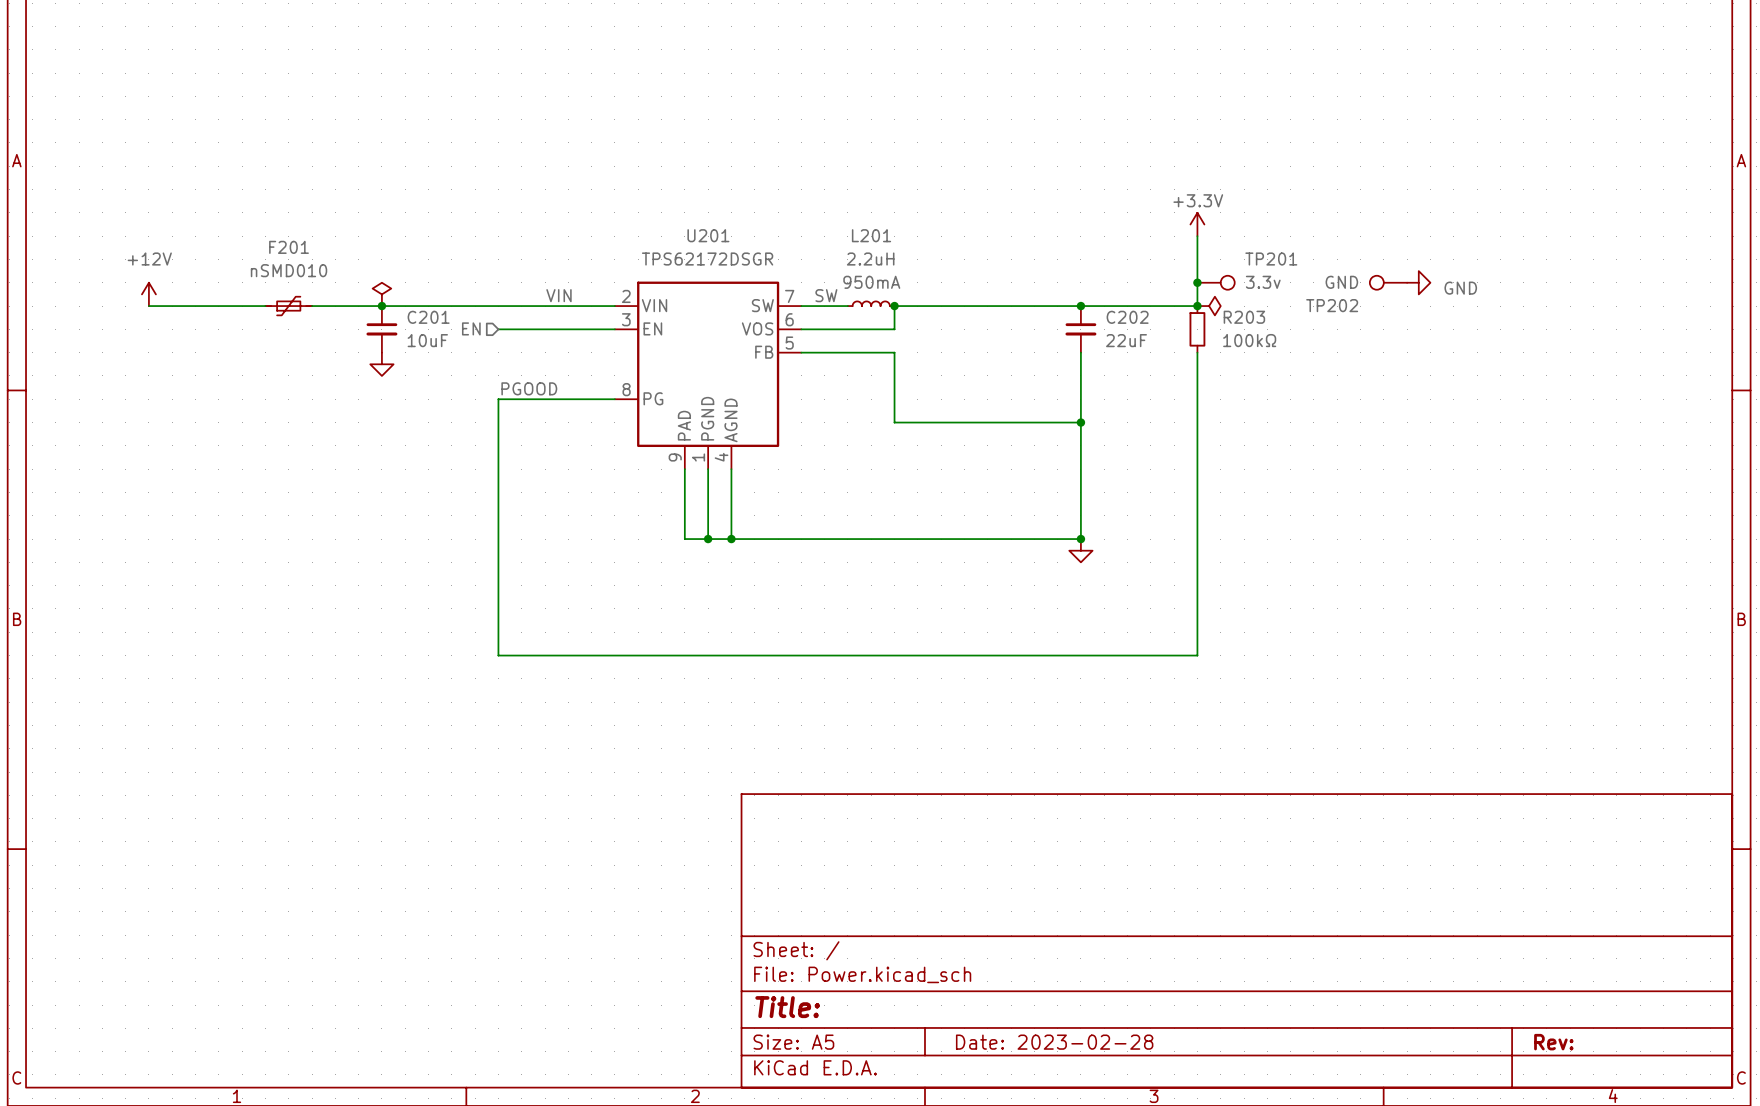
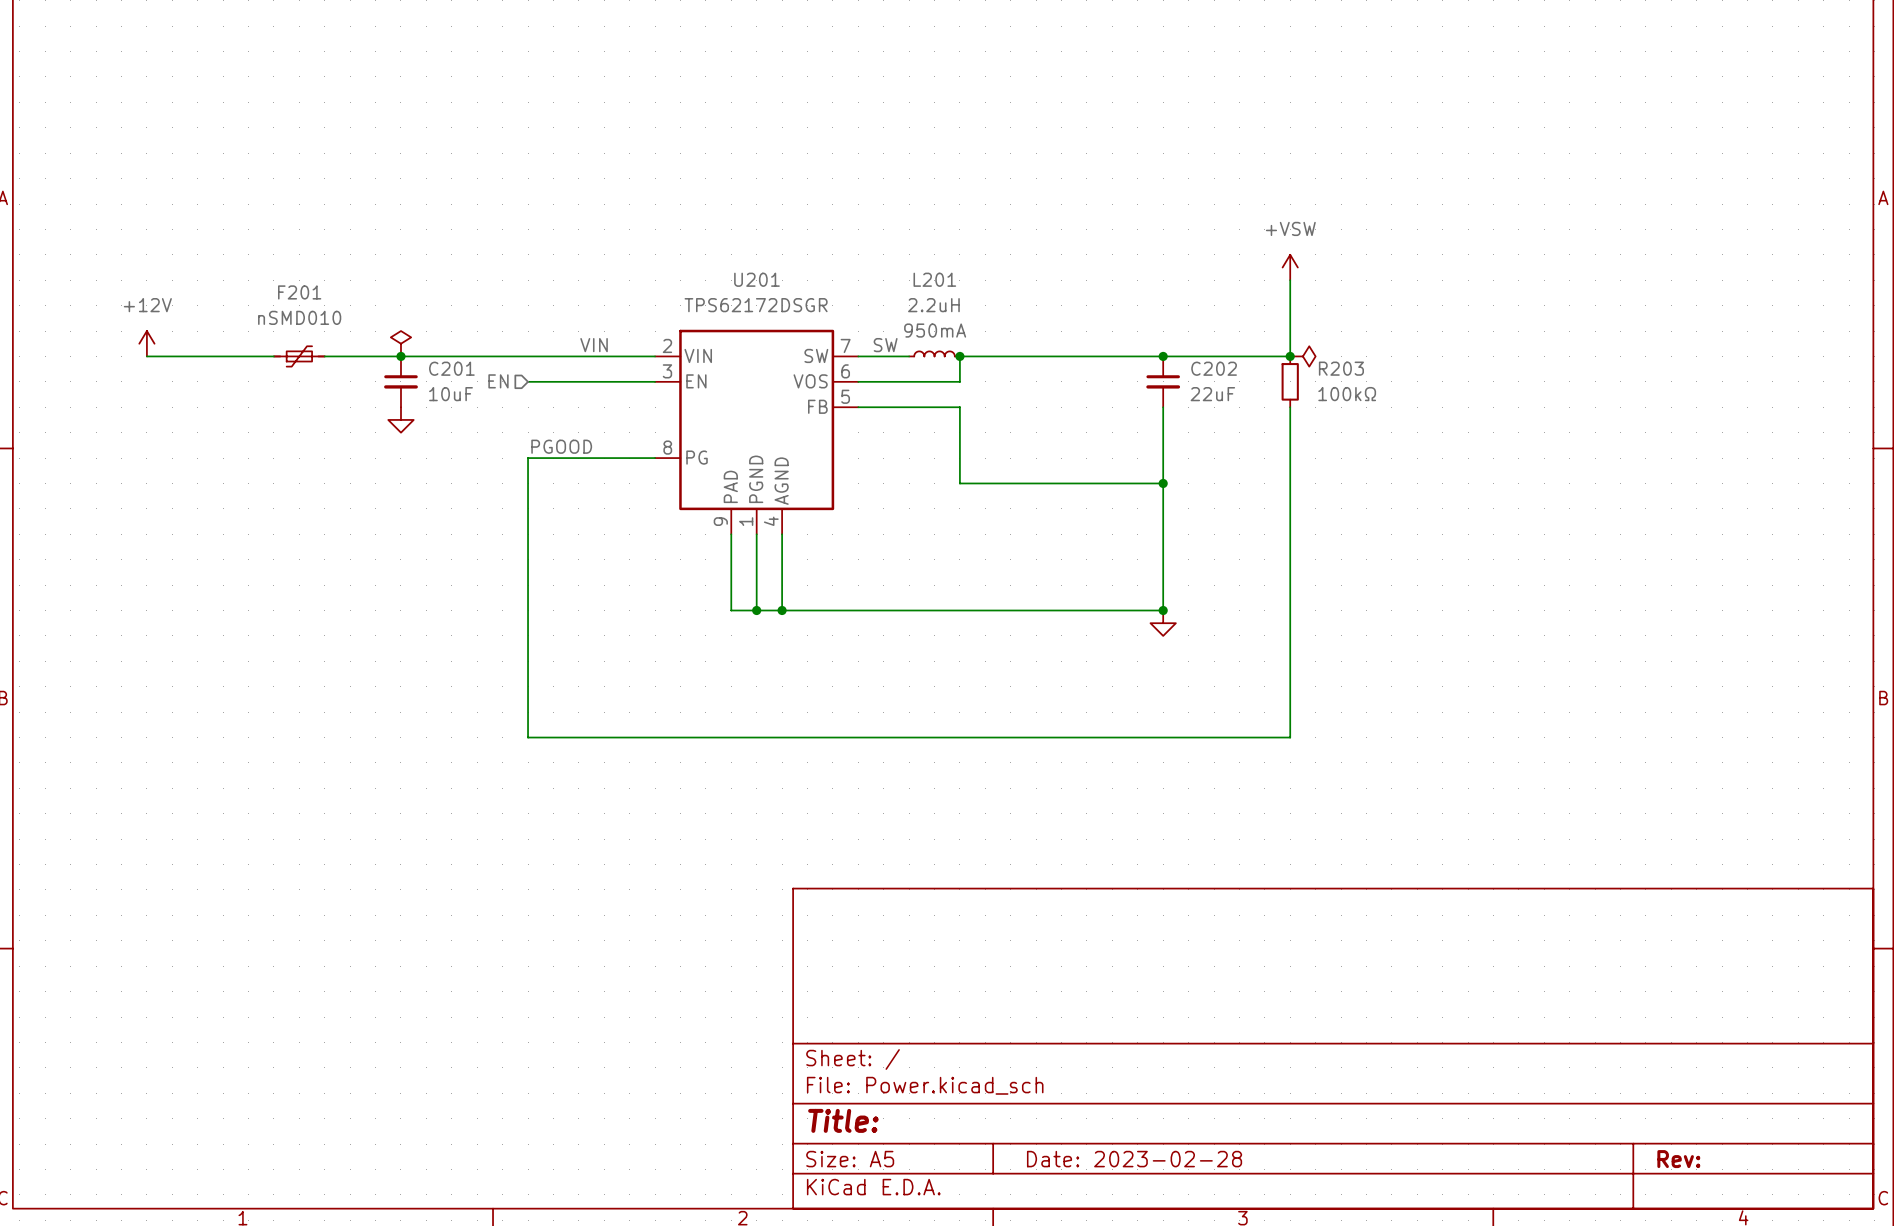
power symbol: +3.3V (1197, 224) -> +VSW (1290, 267)
junction: (1197, 282) -> none
TP201: 3.3v (1216, 282) -> none
TP202: GND (1388, 282) -> none
power symbol: GND (1418, 282) -> none

